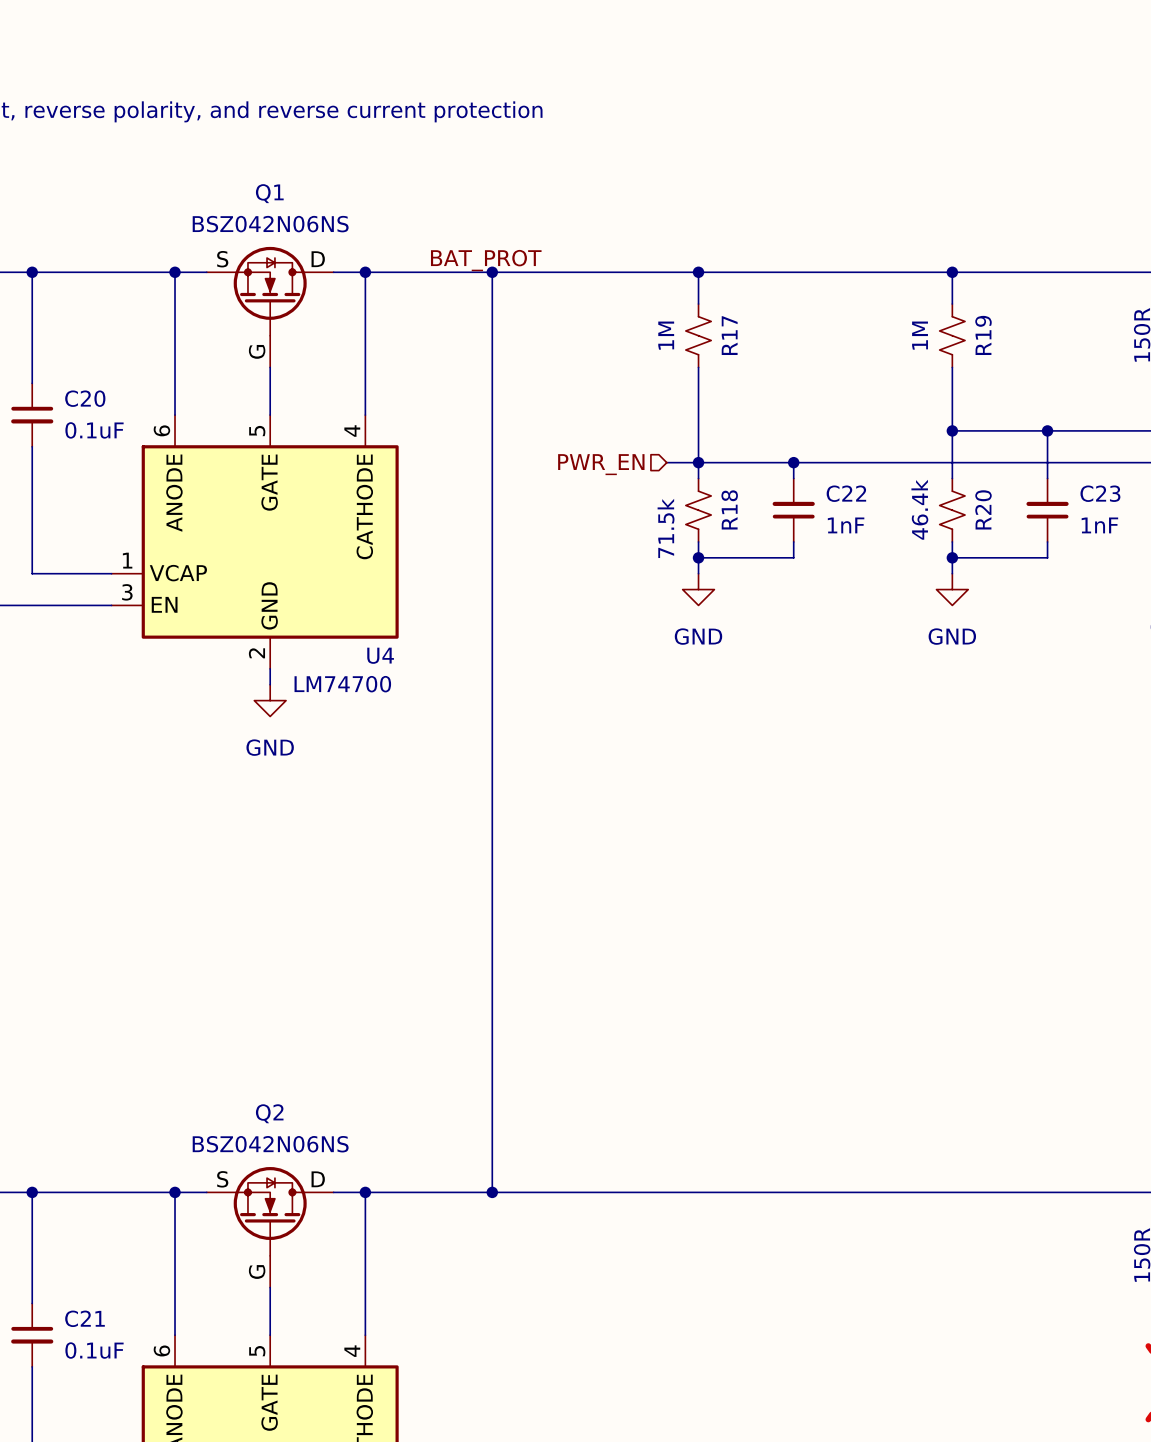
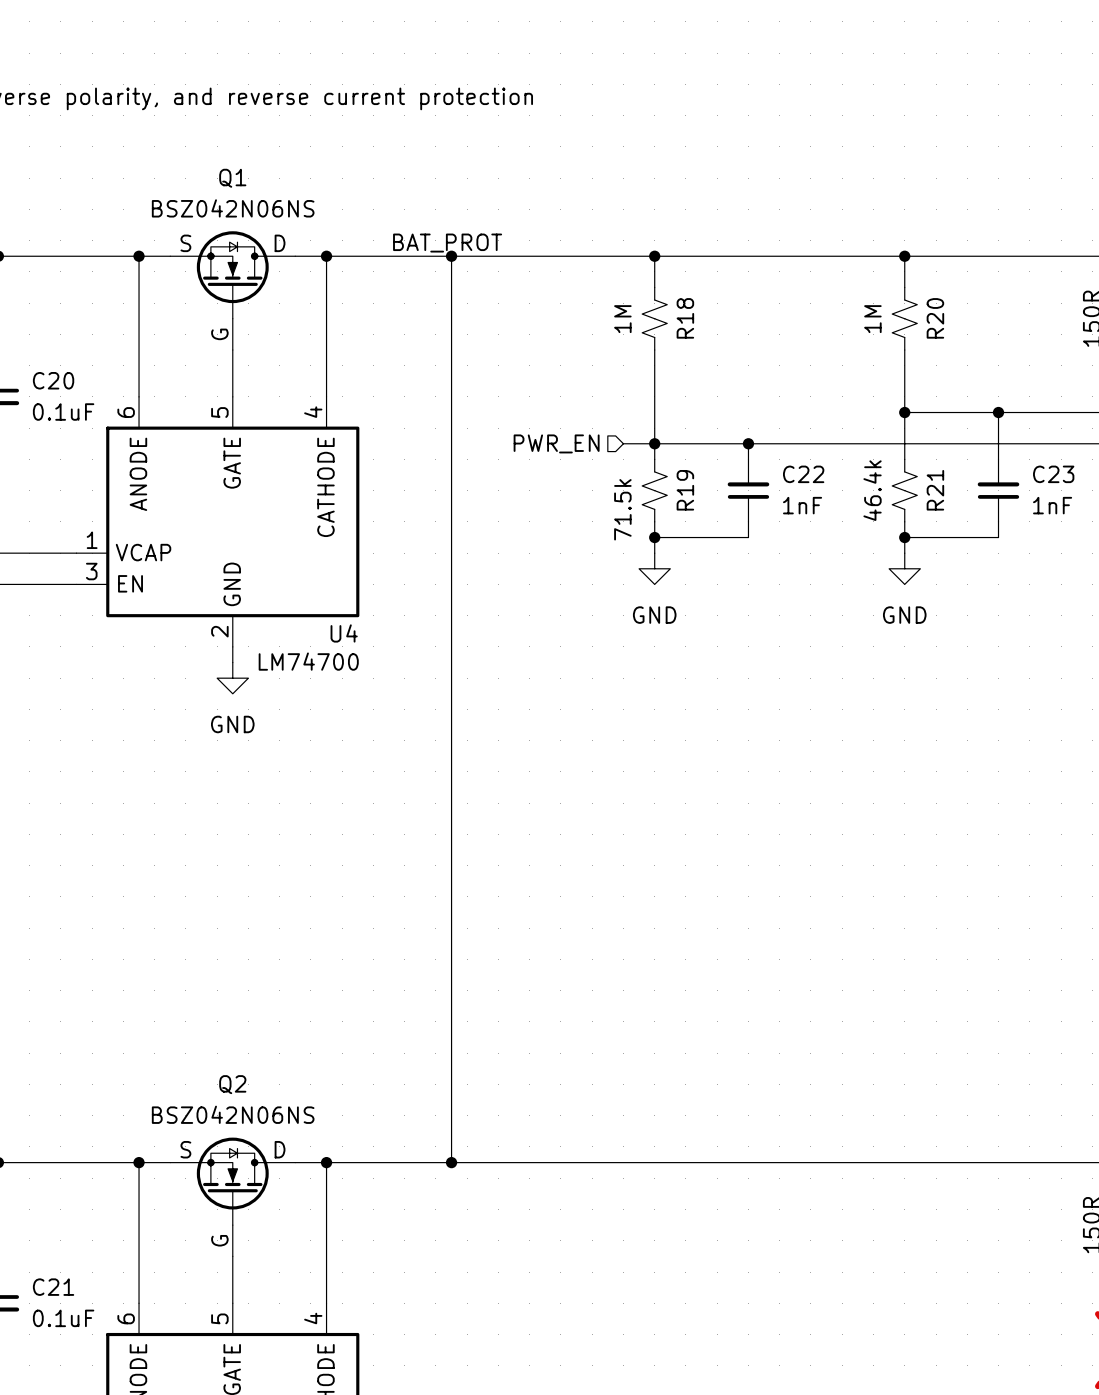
R17 name: R17 (729, 335) -> R18 (685, 318)
R19 name: R19 (983, 335) -> R20 (935, 318)
R18 name: R18 (729, 509) -> R19 (685, 490)
R20 name: R20 (983, 509) -> R21 (935, 490)

